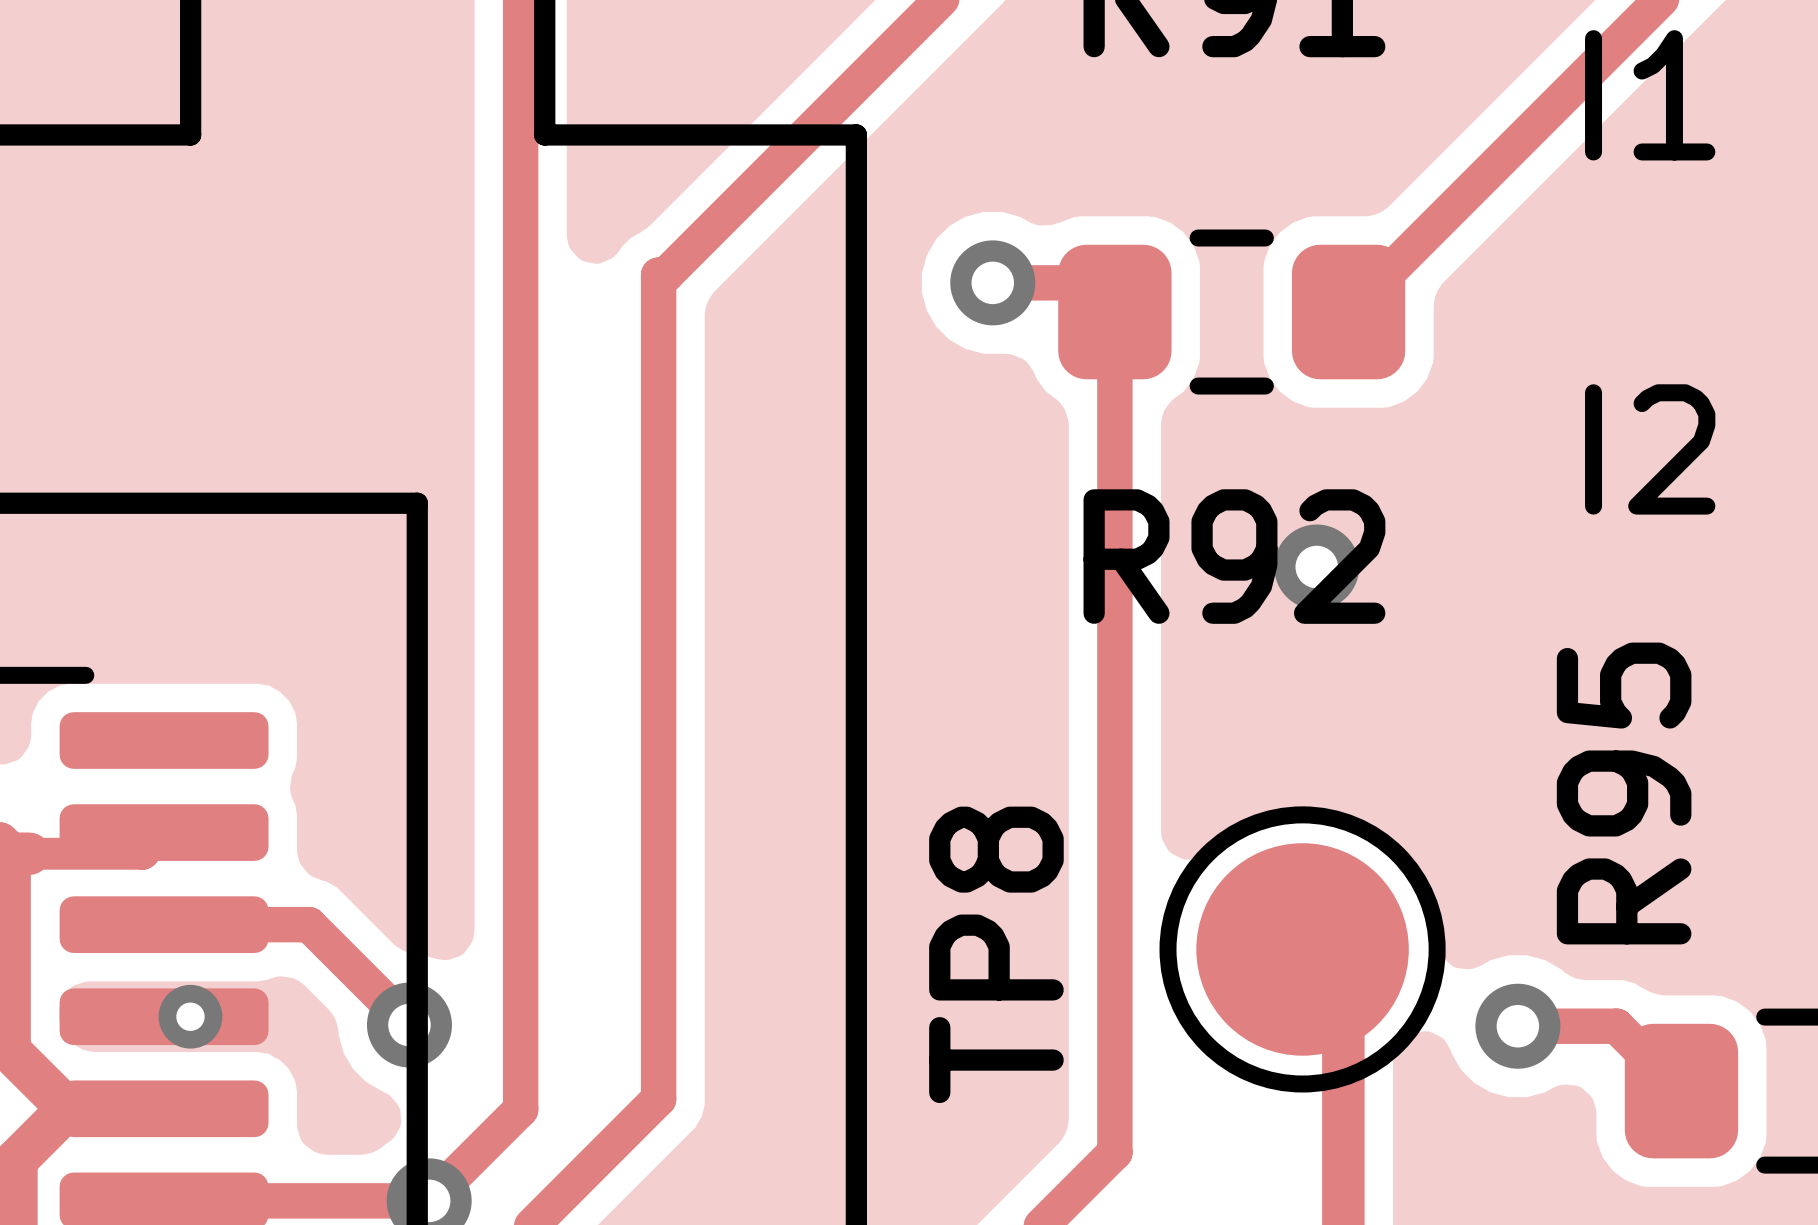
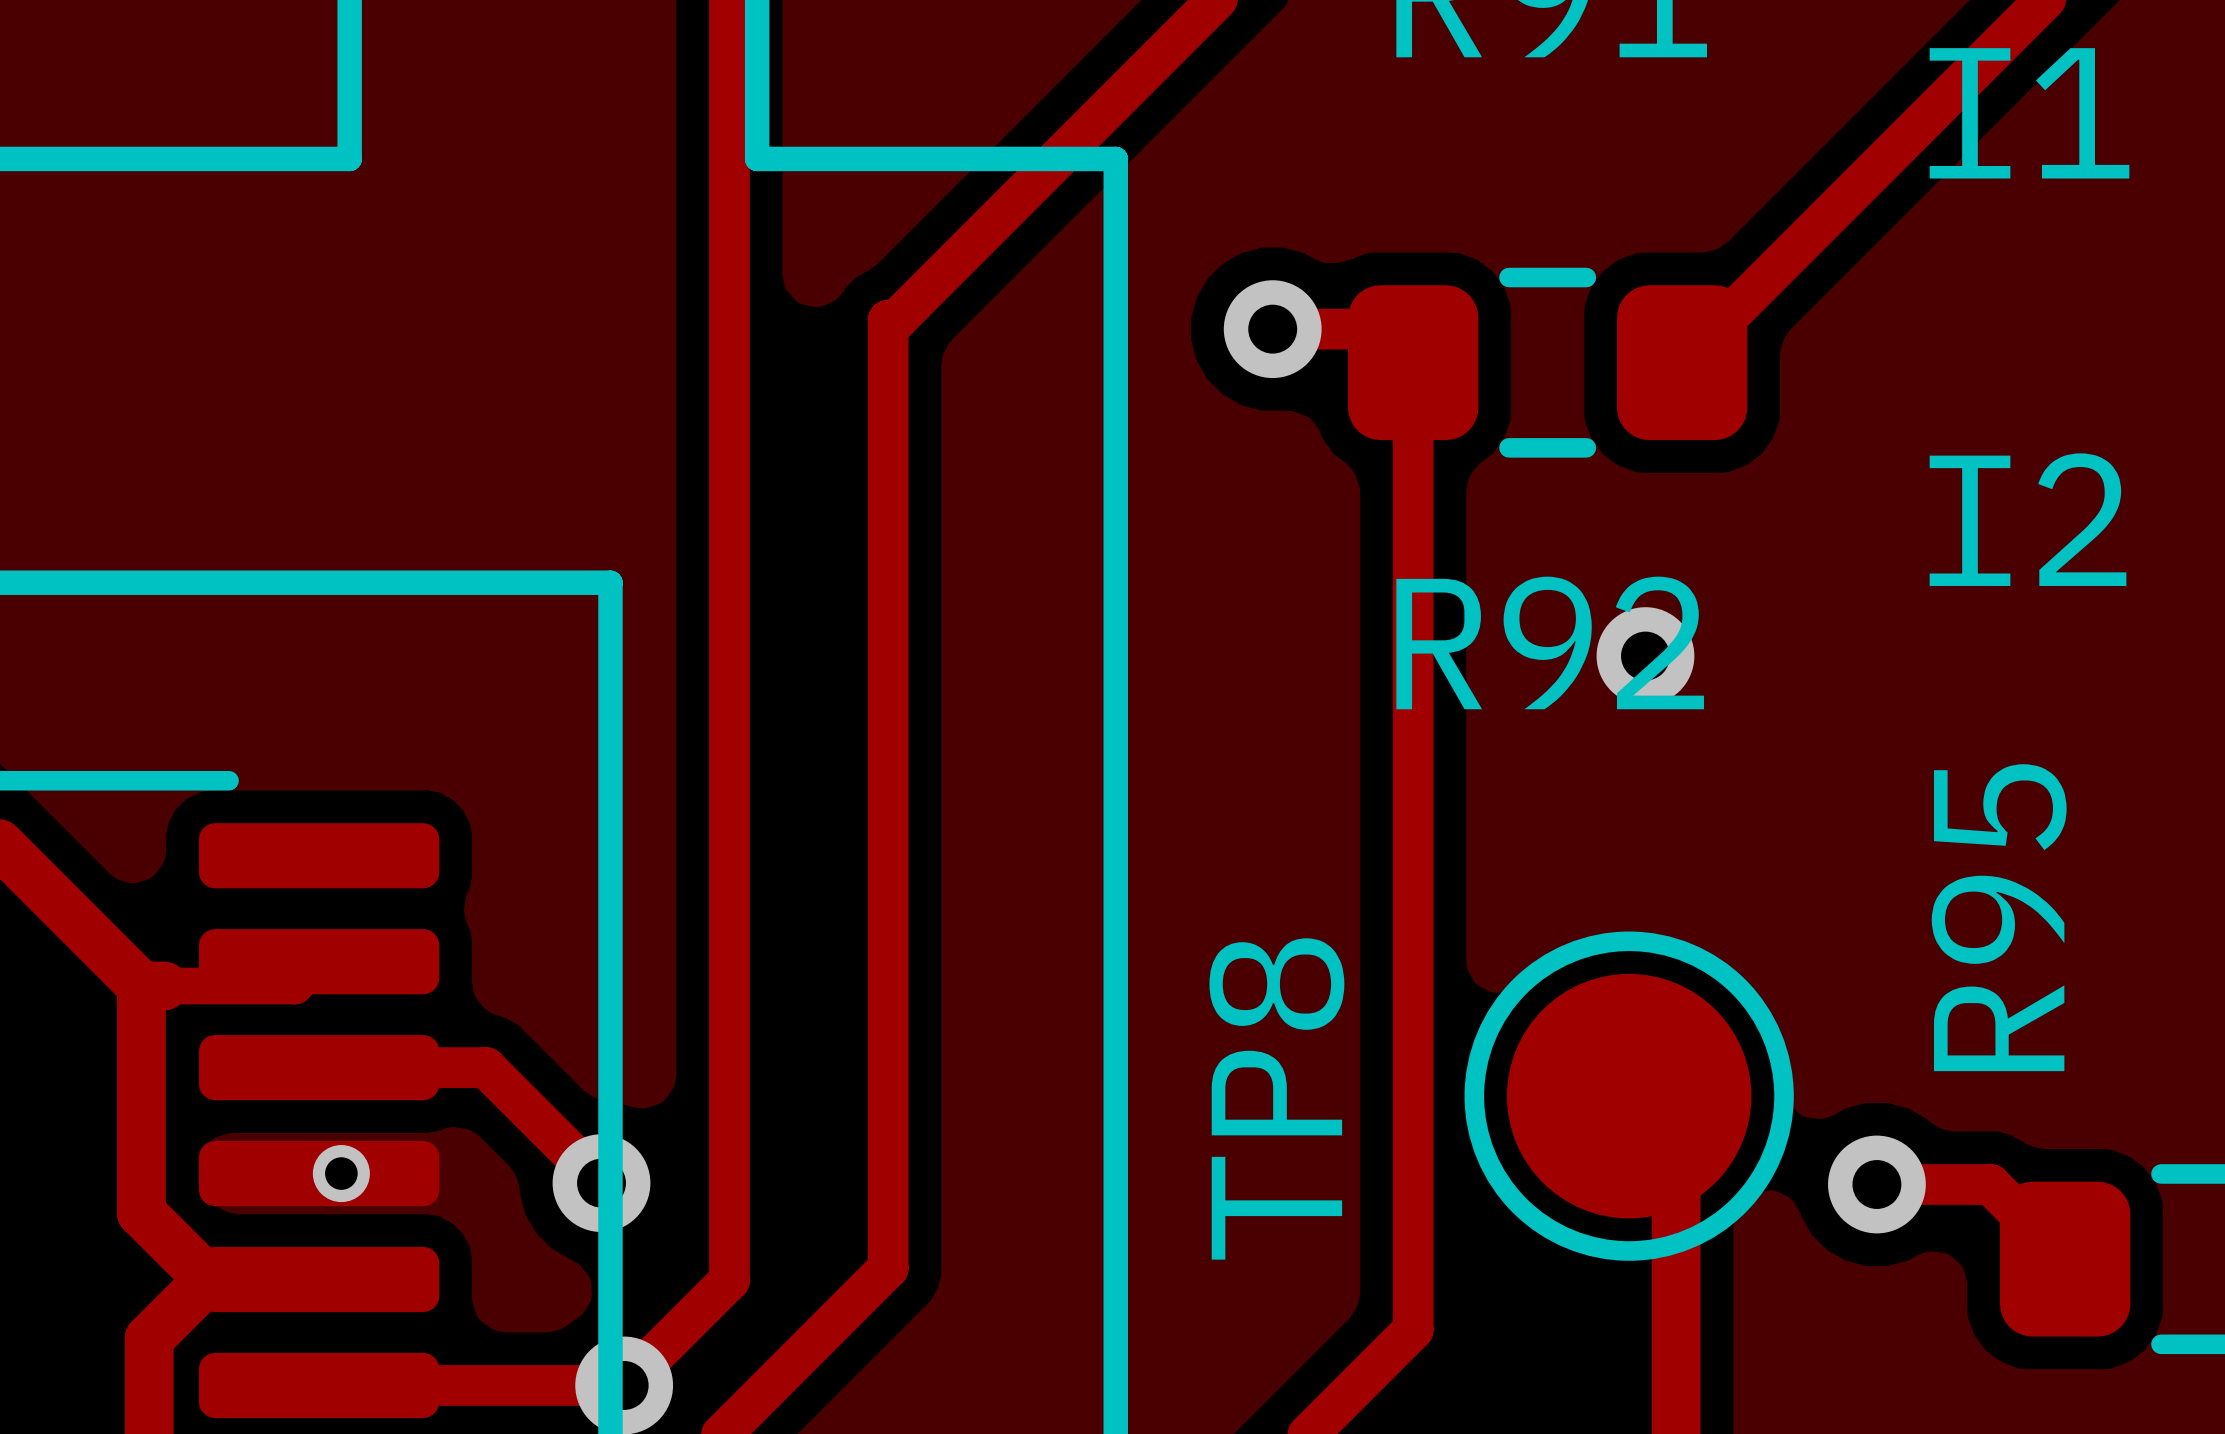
via size: [158, 984, 223, 1049] -> [312, 1145, 370, 1203]

